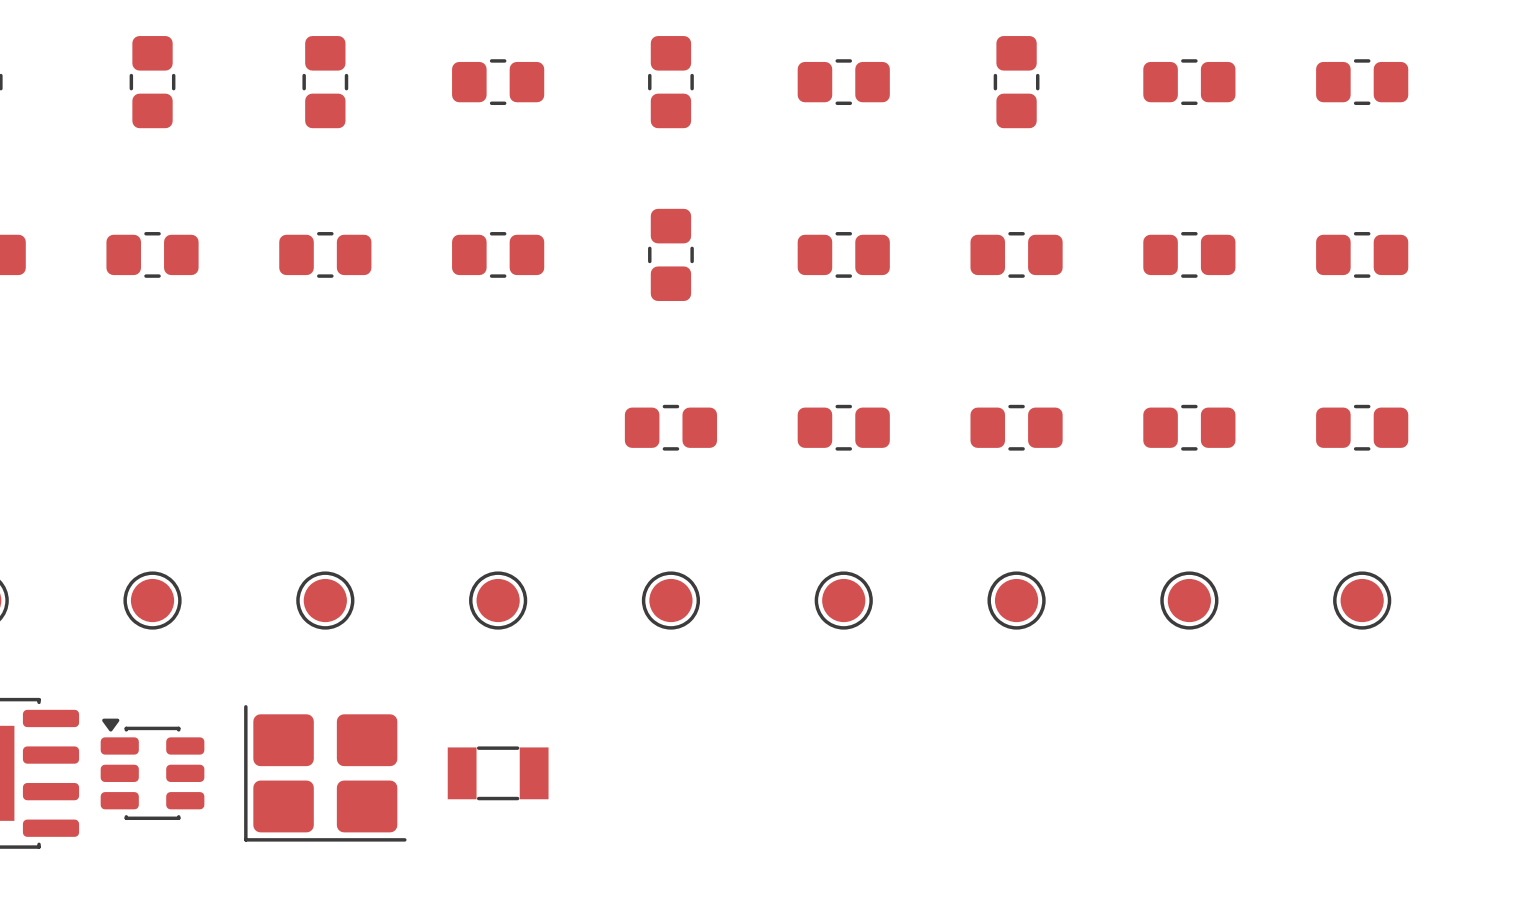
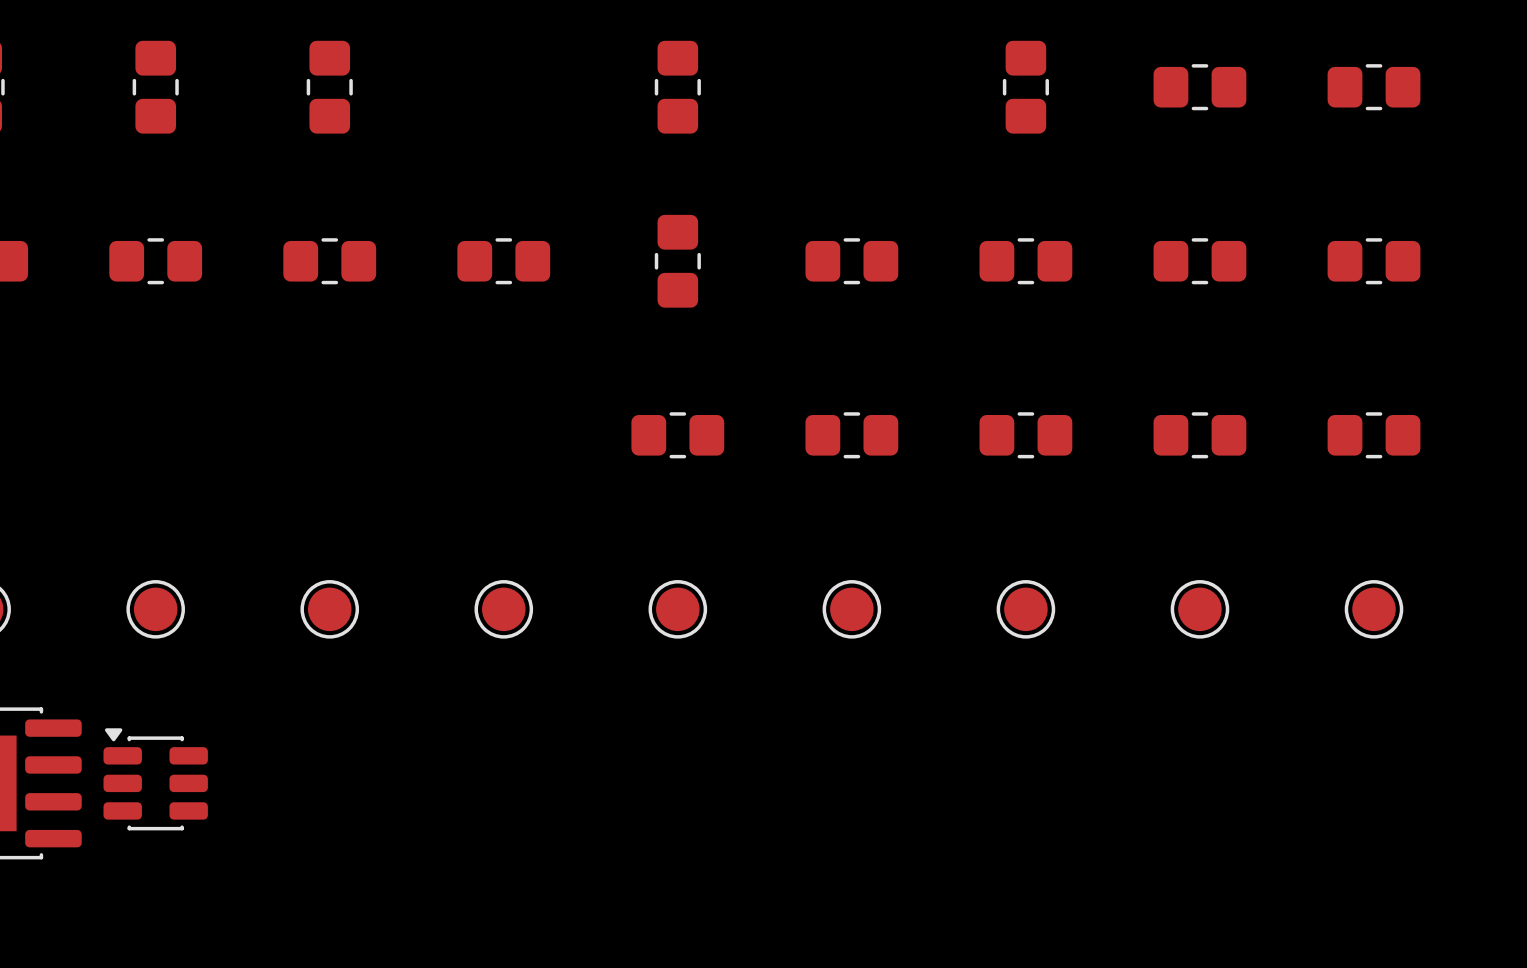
part: (498, 82) -> none
part: (843, 82) -> none
part: (325, 773) -> none
part: (498, 773) -> none

